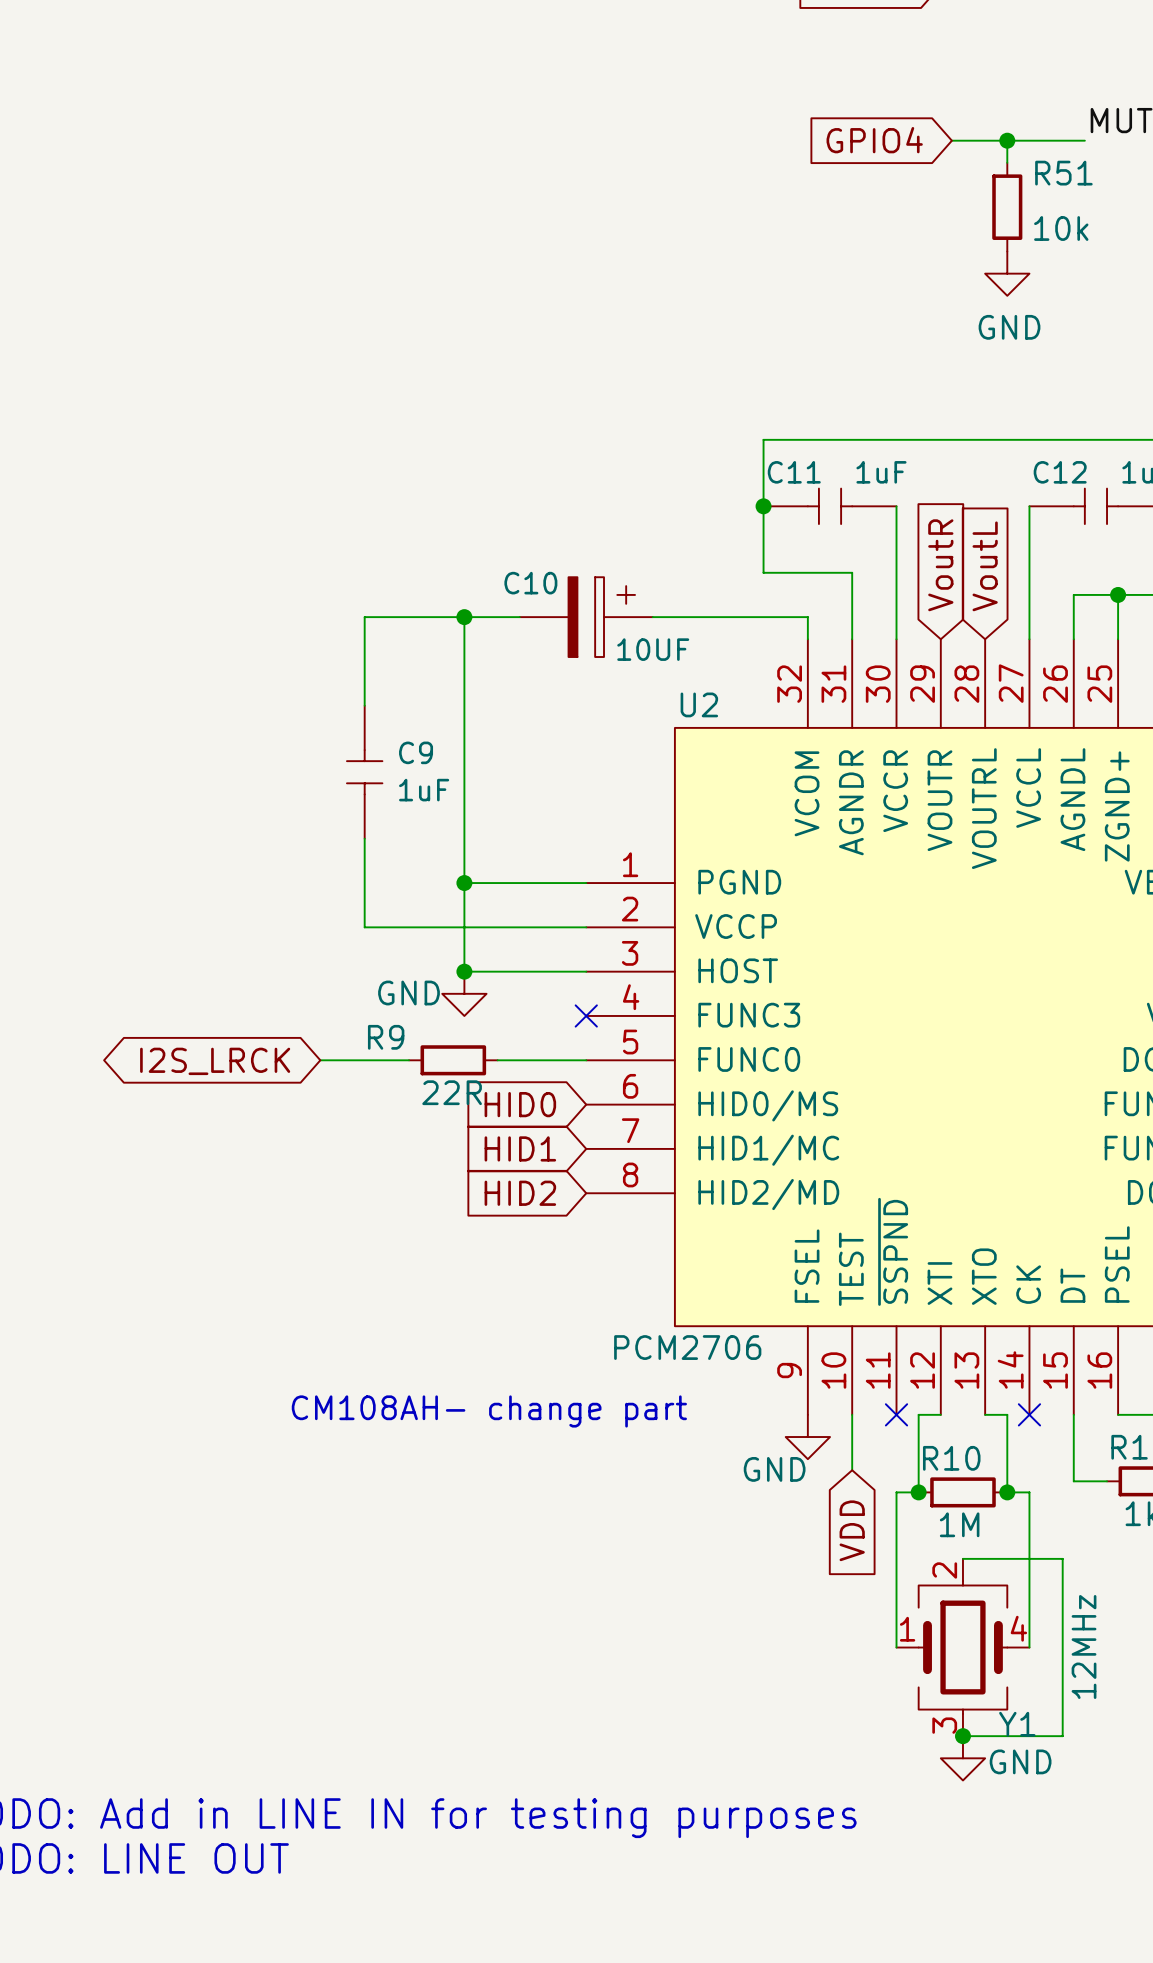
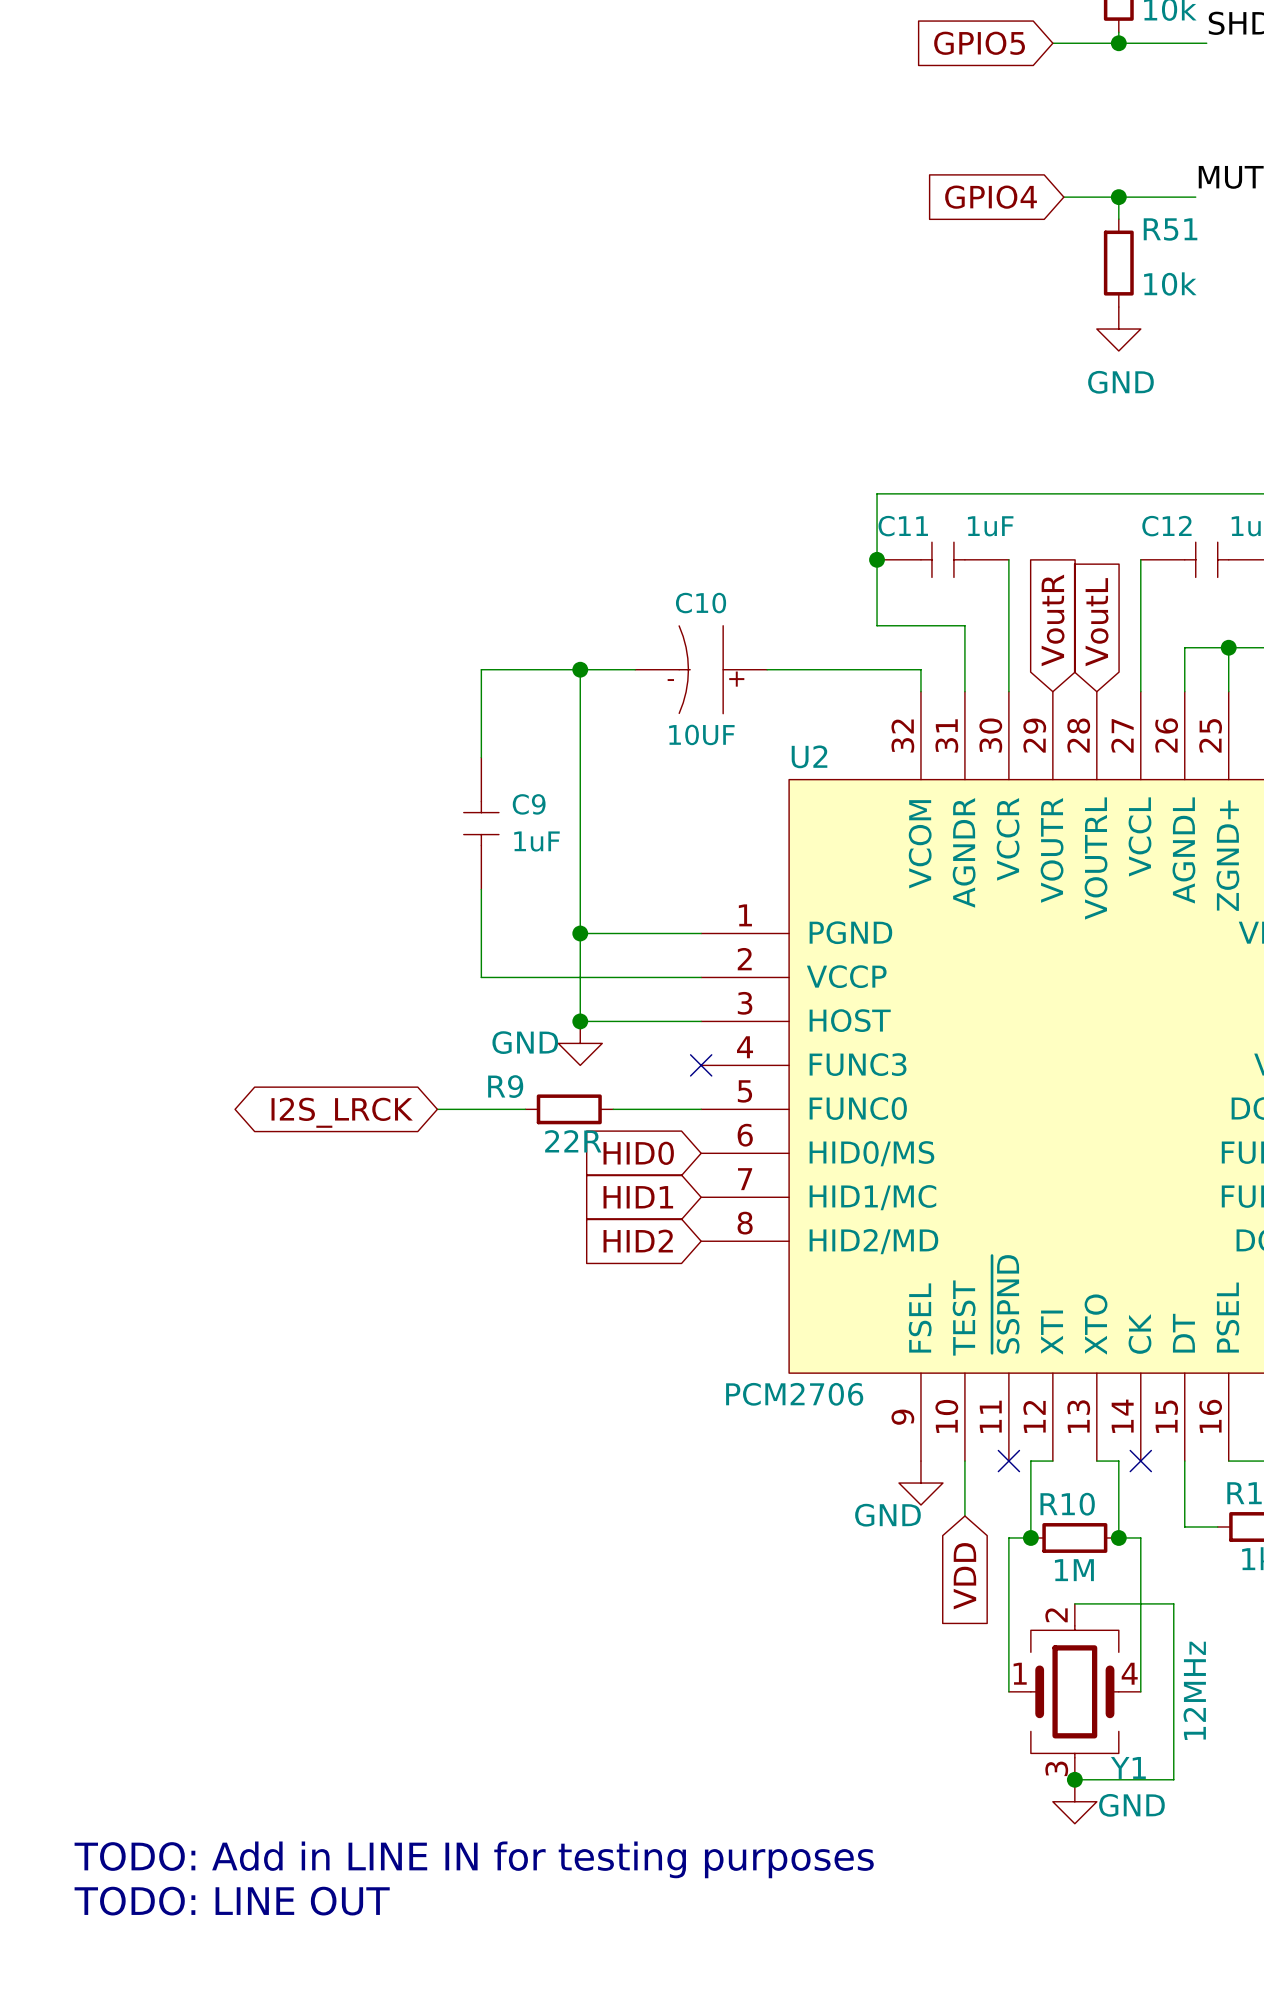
C10 symbol: [519, 577, 653, 658] -> [635, 625, 768, 714]
C10 name position: C10 (530, 583) -> C10 (701, 603)
C10 value position: 10UF (653, 649) -> 10UF (701, 734)
text: CM108AH- change part (489, 1411) -> none

